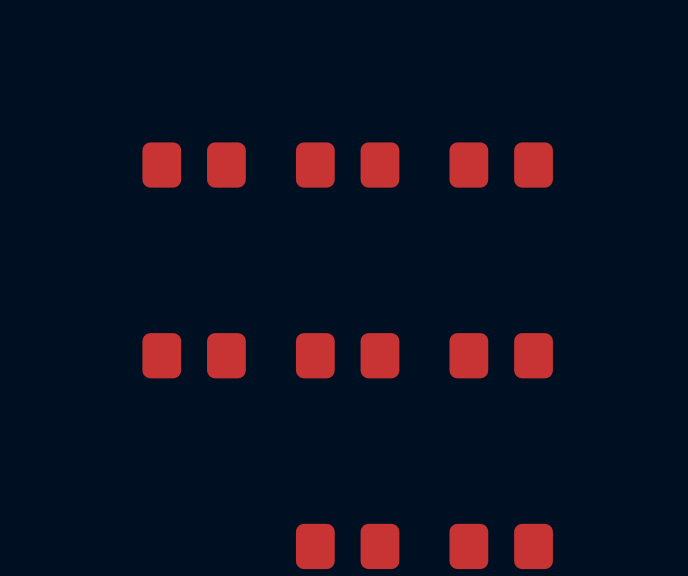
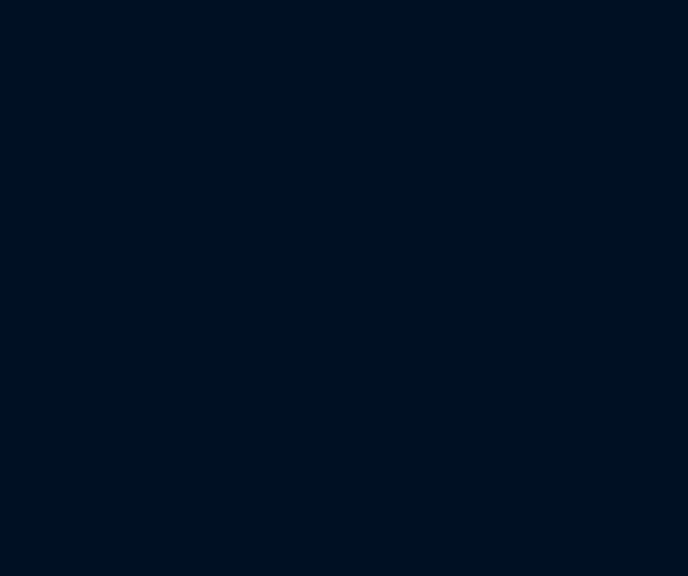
part: (194, 165) -> none
part: (347, 165) -> none
part: (501, 165) -> none
part: (194, 355) -> none
part: (347, 355) -> none
part: (501, 355) -> none
part: (347, 546) -> none
part: (501, 546) -> none

